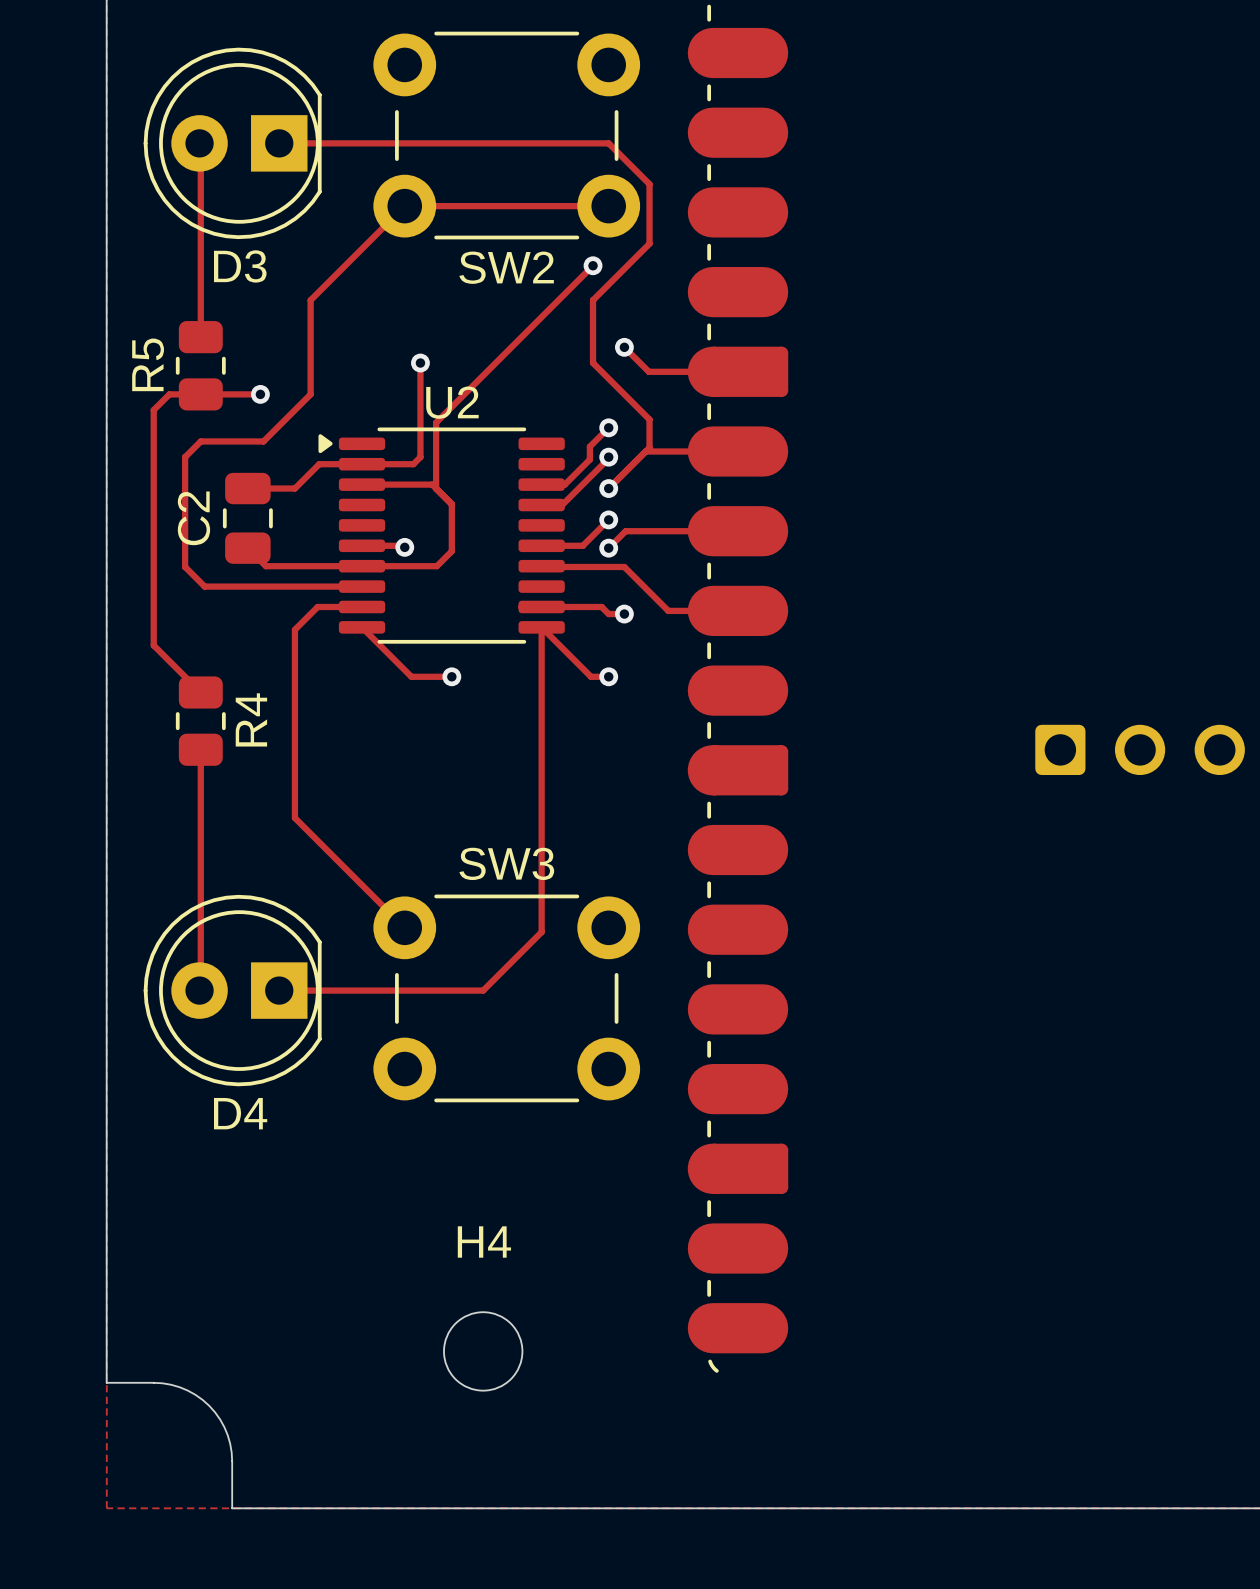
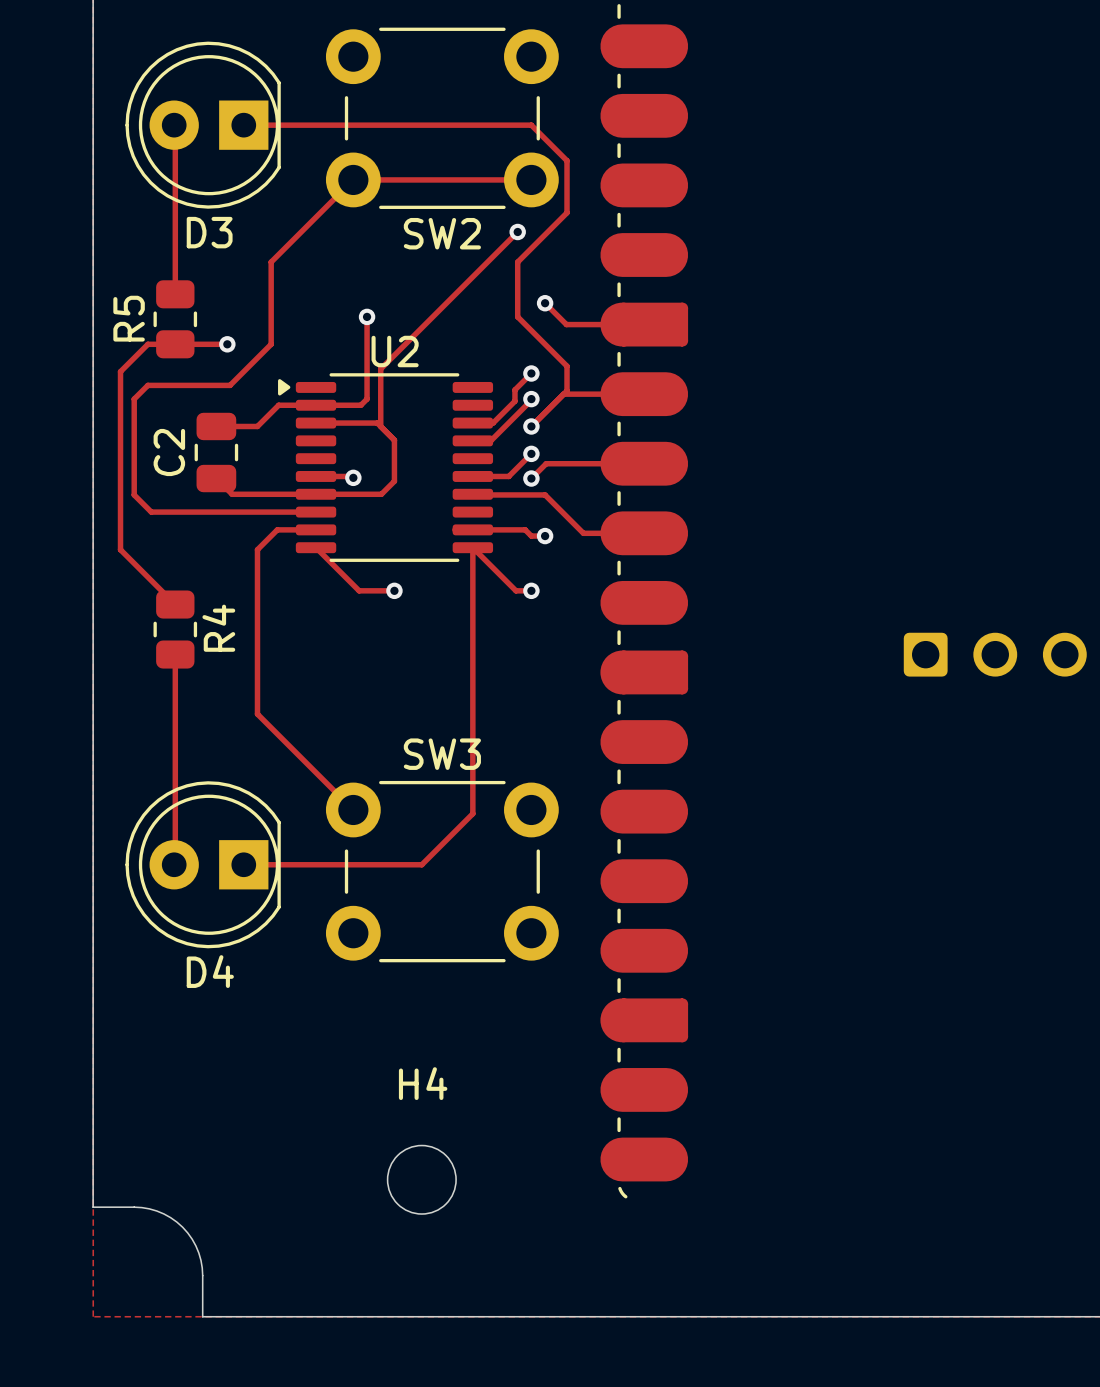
track: (153, 410) (153, 457) -> (175, 385) (147, 385) (134, 399)
track: none -> (134, 358) (120, 371) (120, 549) (134, 563)
track: (200, 441) (185, 457) (185, 566) (204, 586) -> none
track: (153, 566) (153, 645) -> (134, 494) (151, 512) (178, 512)

